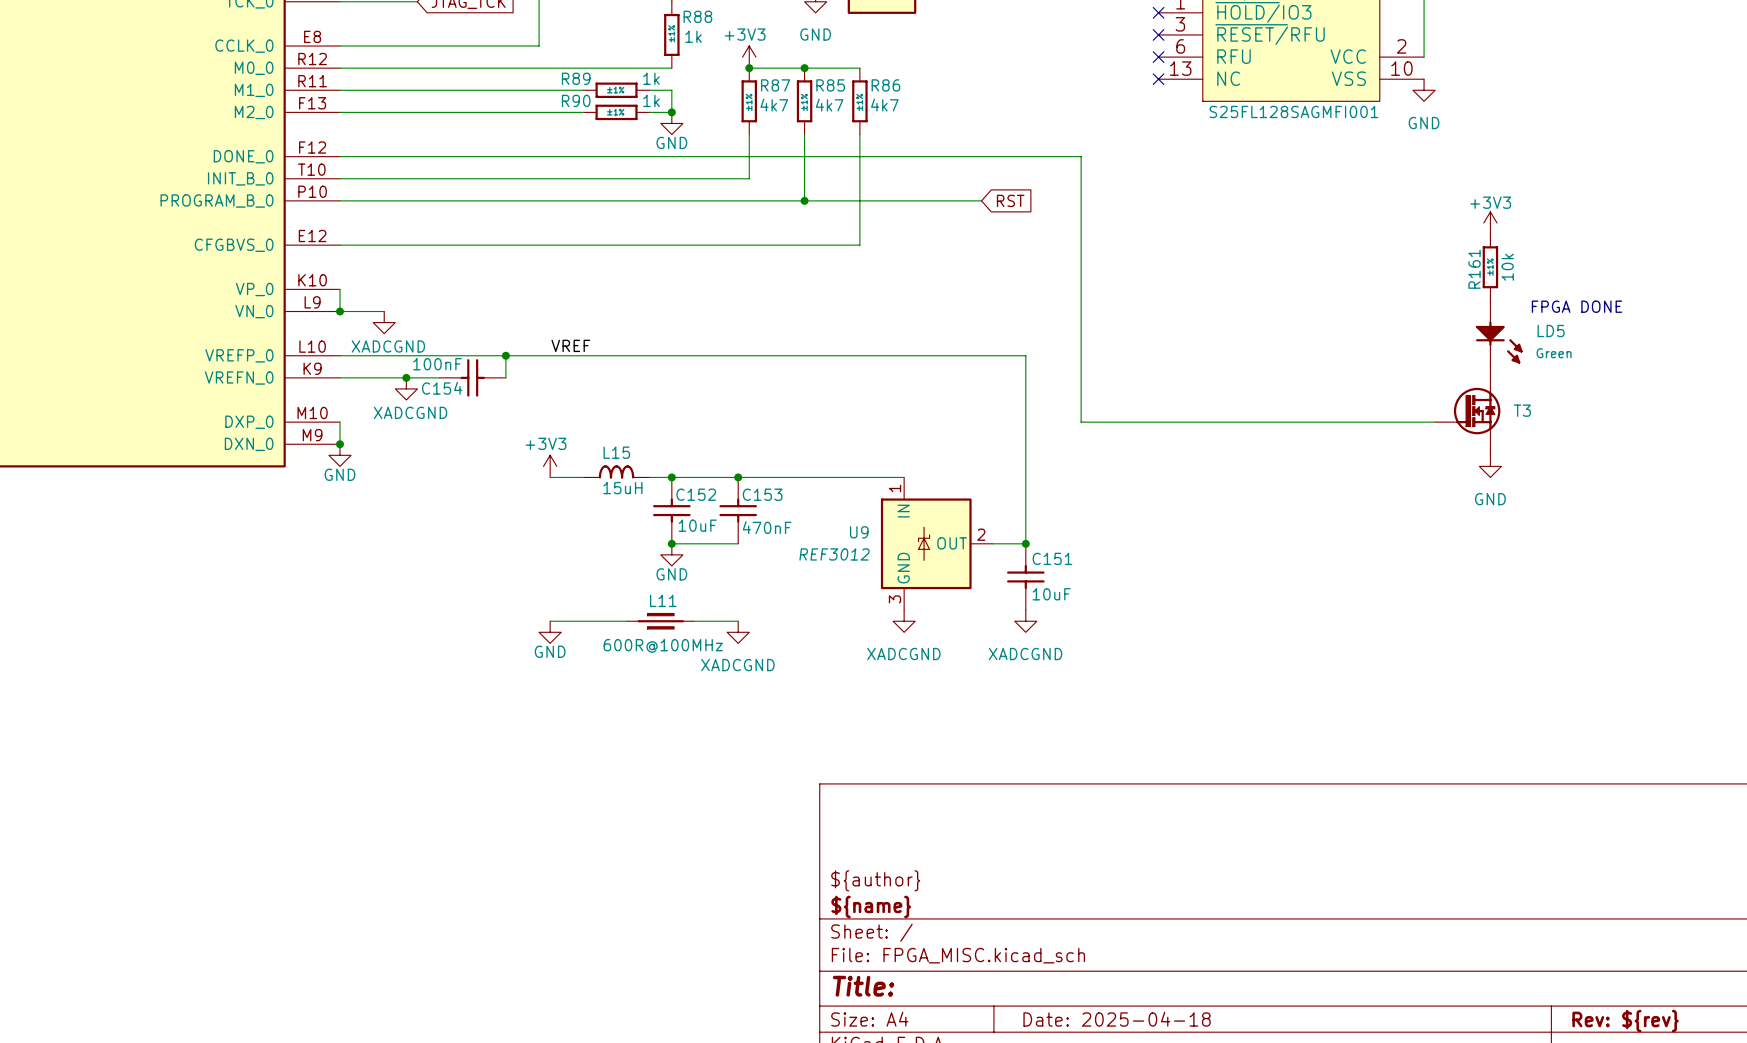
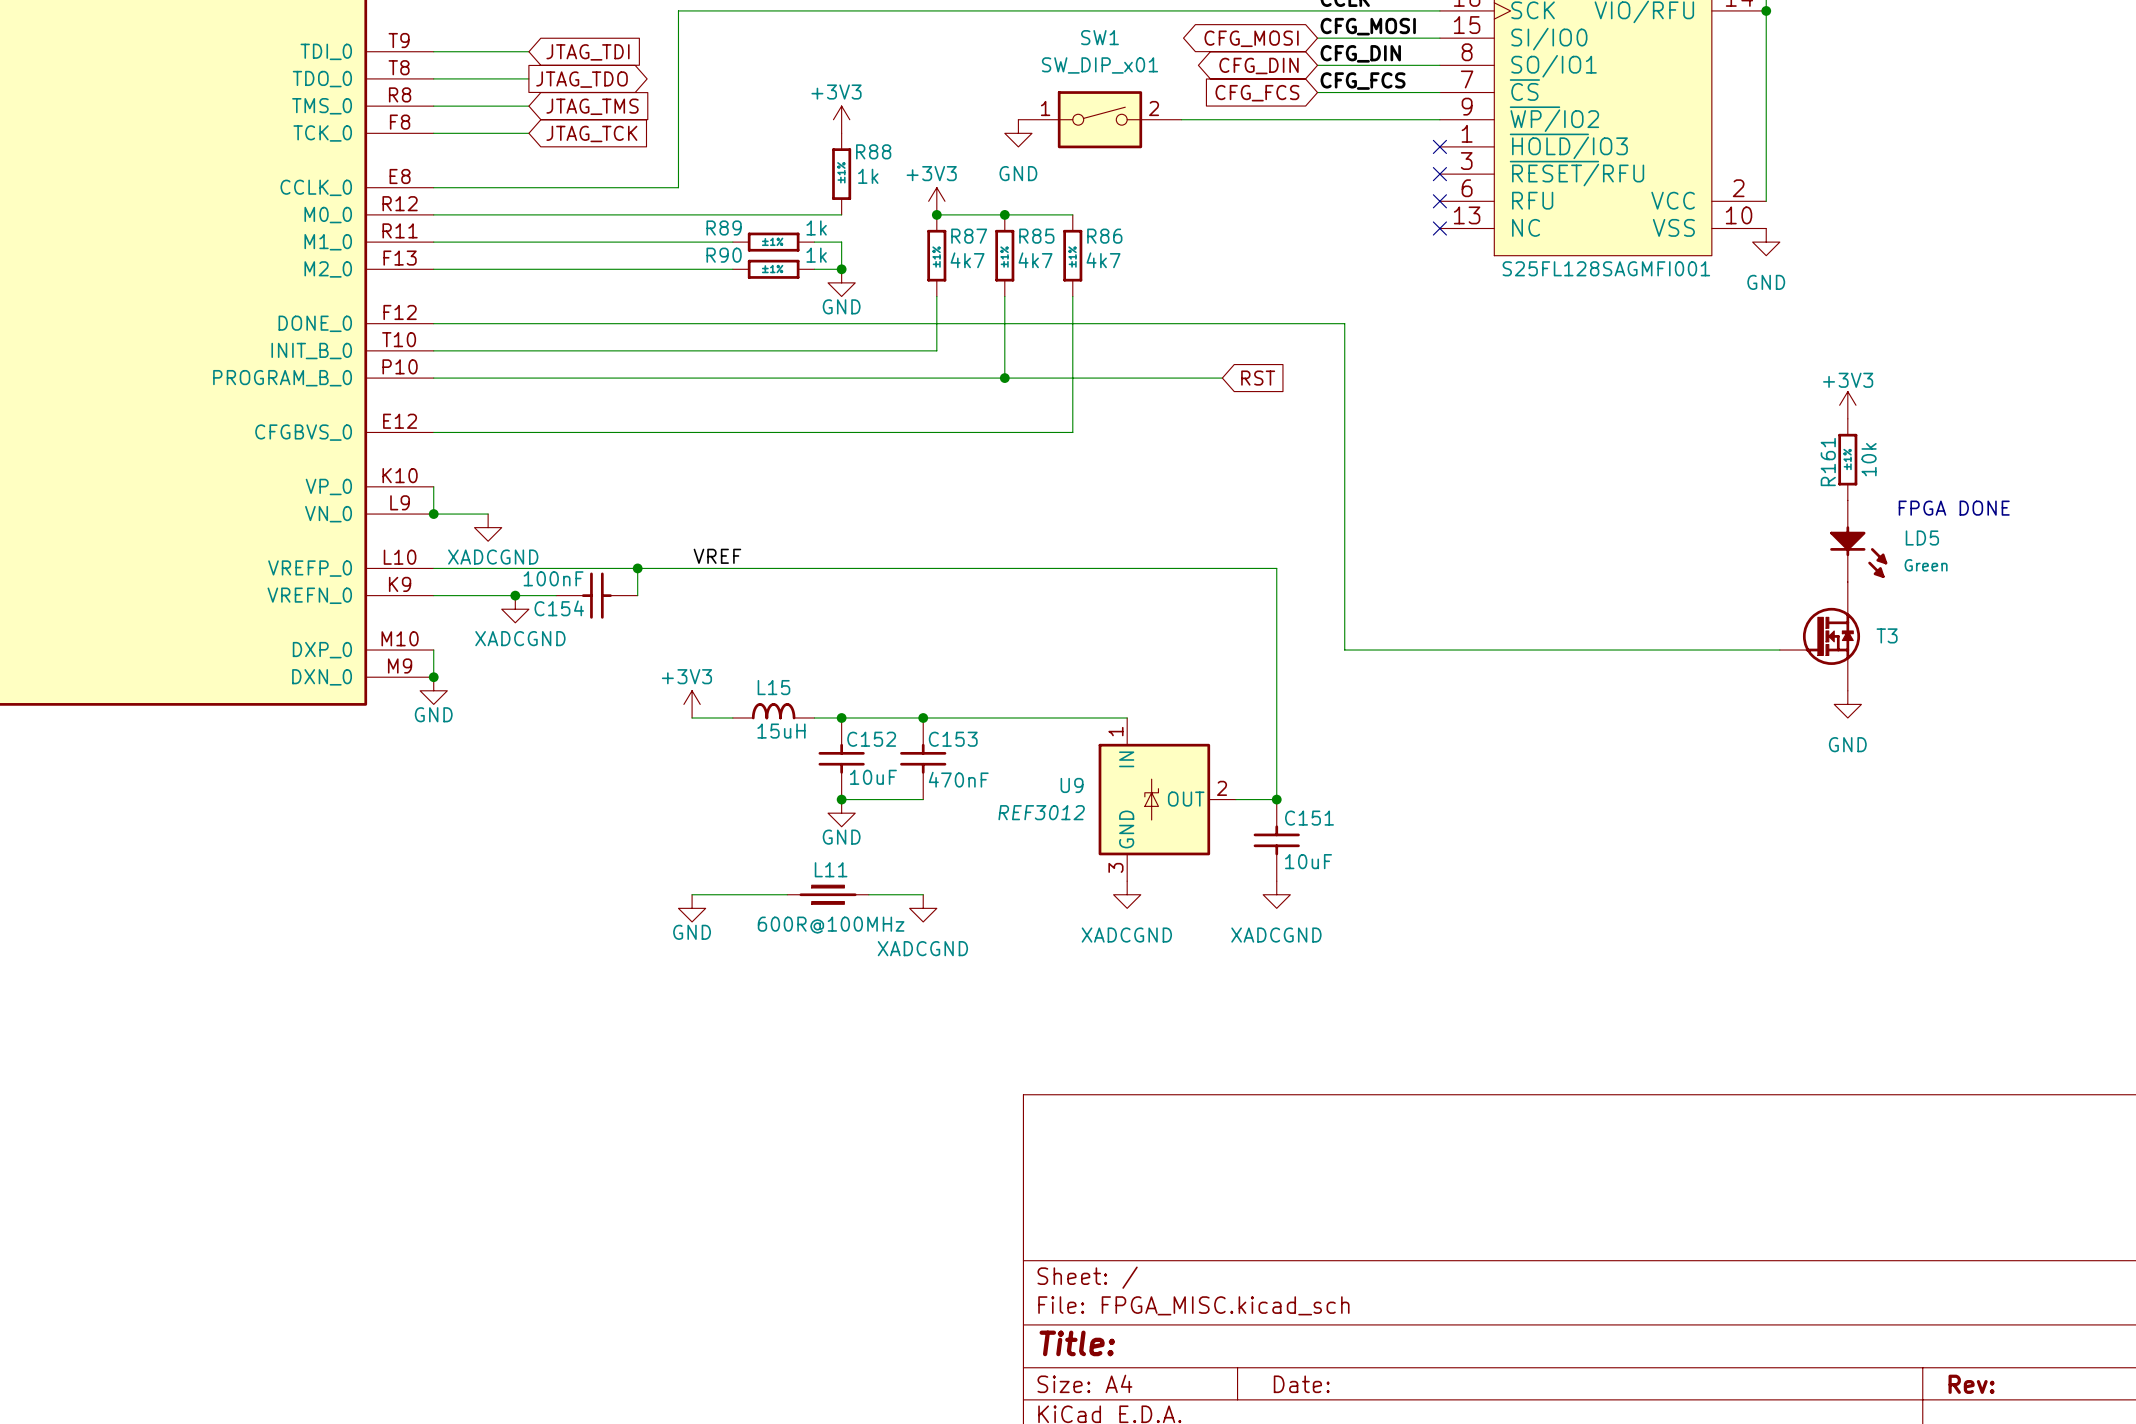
title block: ${author} (875, 880) -> none
title block: ${name} (871, 906) -> none
title block: Date: 2025-04-18 (1117, 1019) -> Date: (1301, 1384)
title block: Rev: ${rev} (1625, 1021) -> Rev: (1971, 1384)

